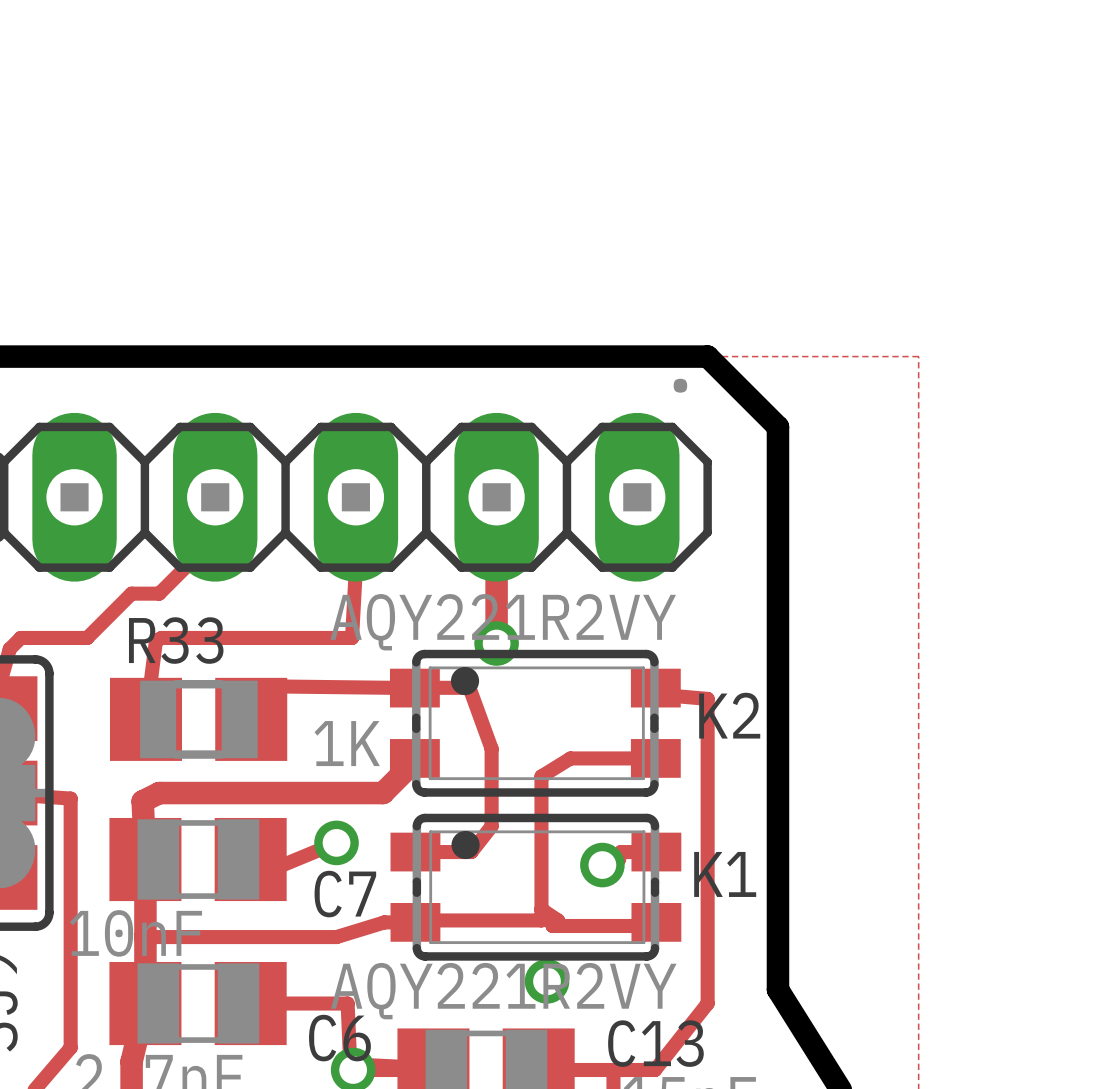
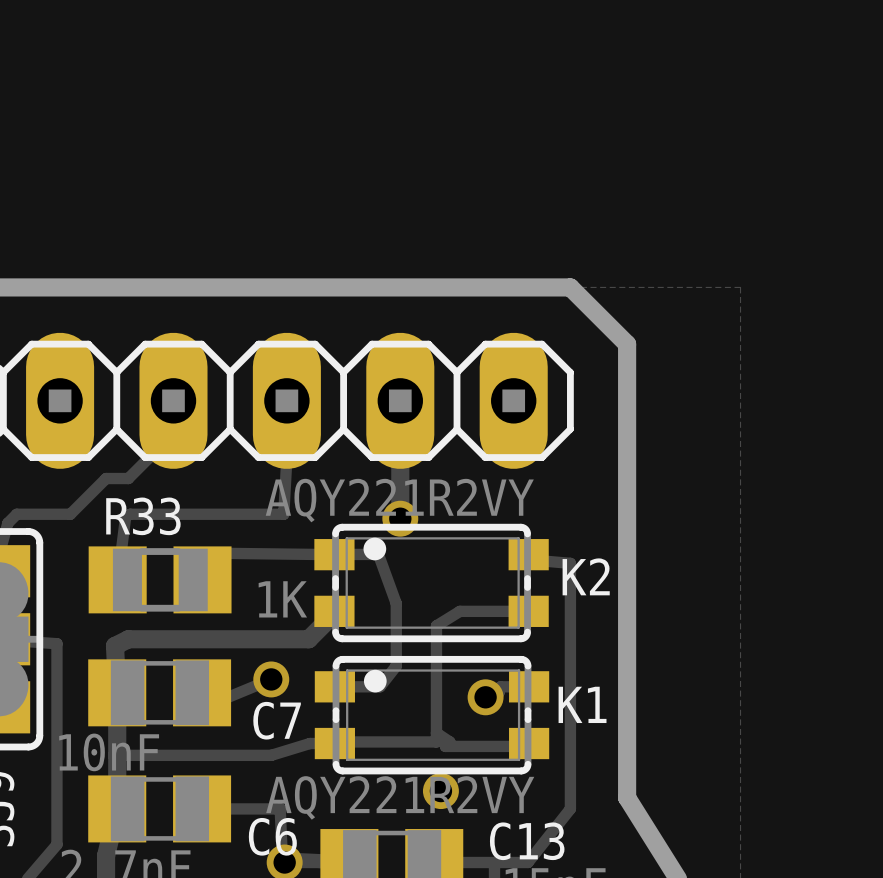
part value: . (680, 385) -> none

